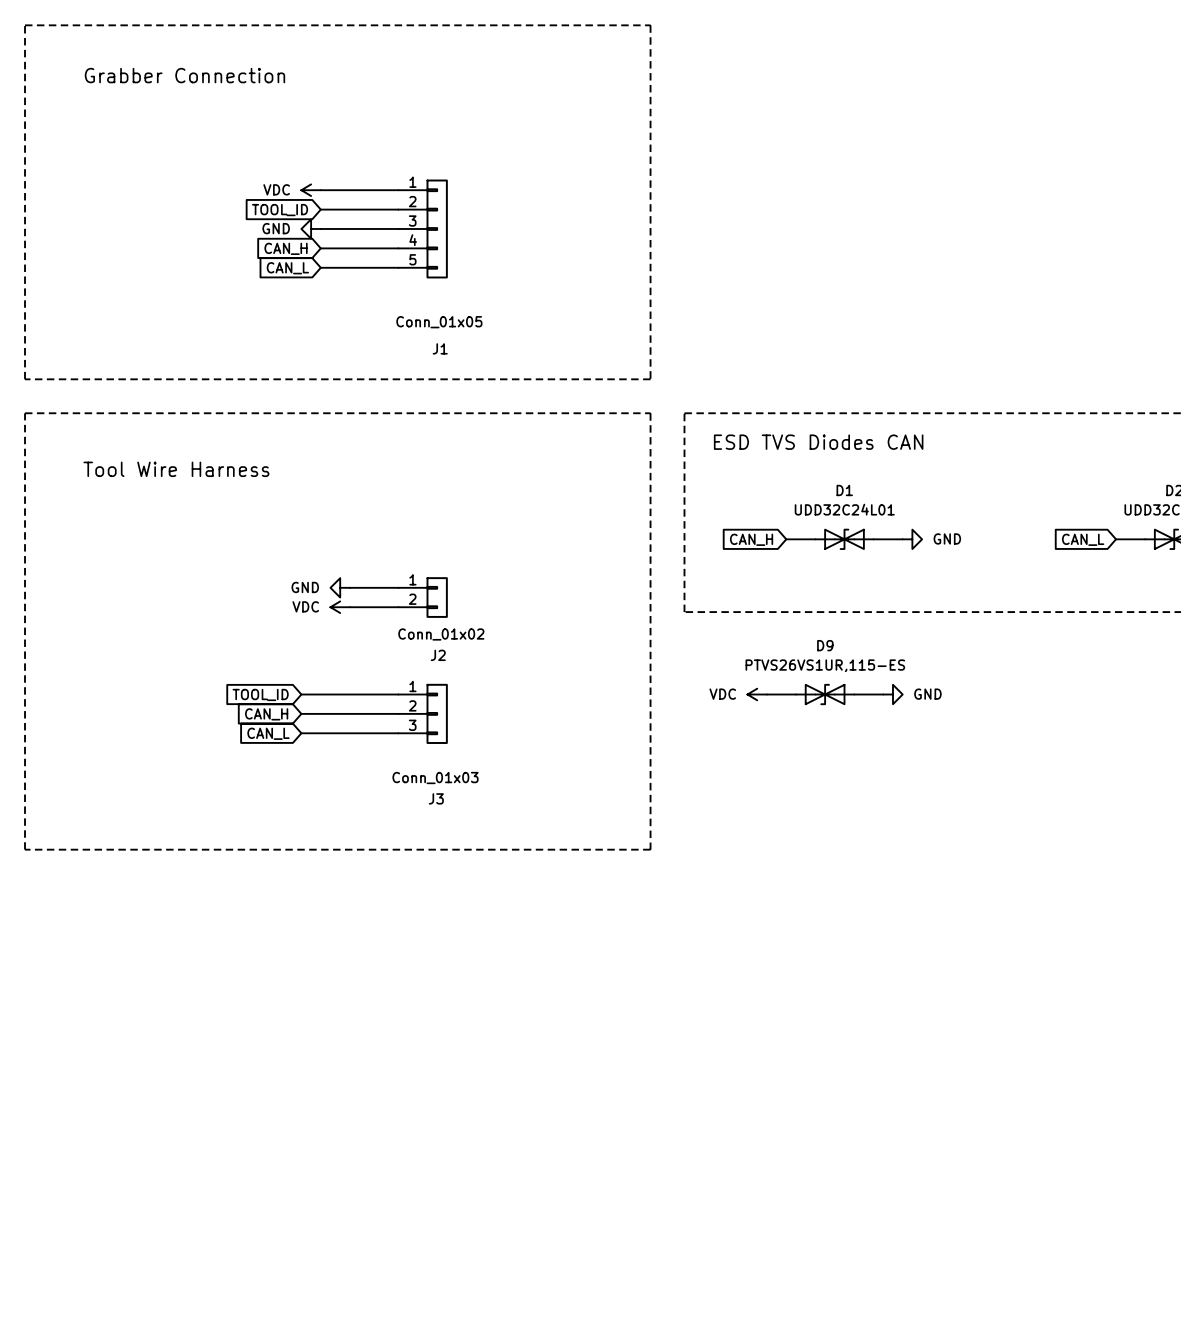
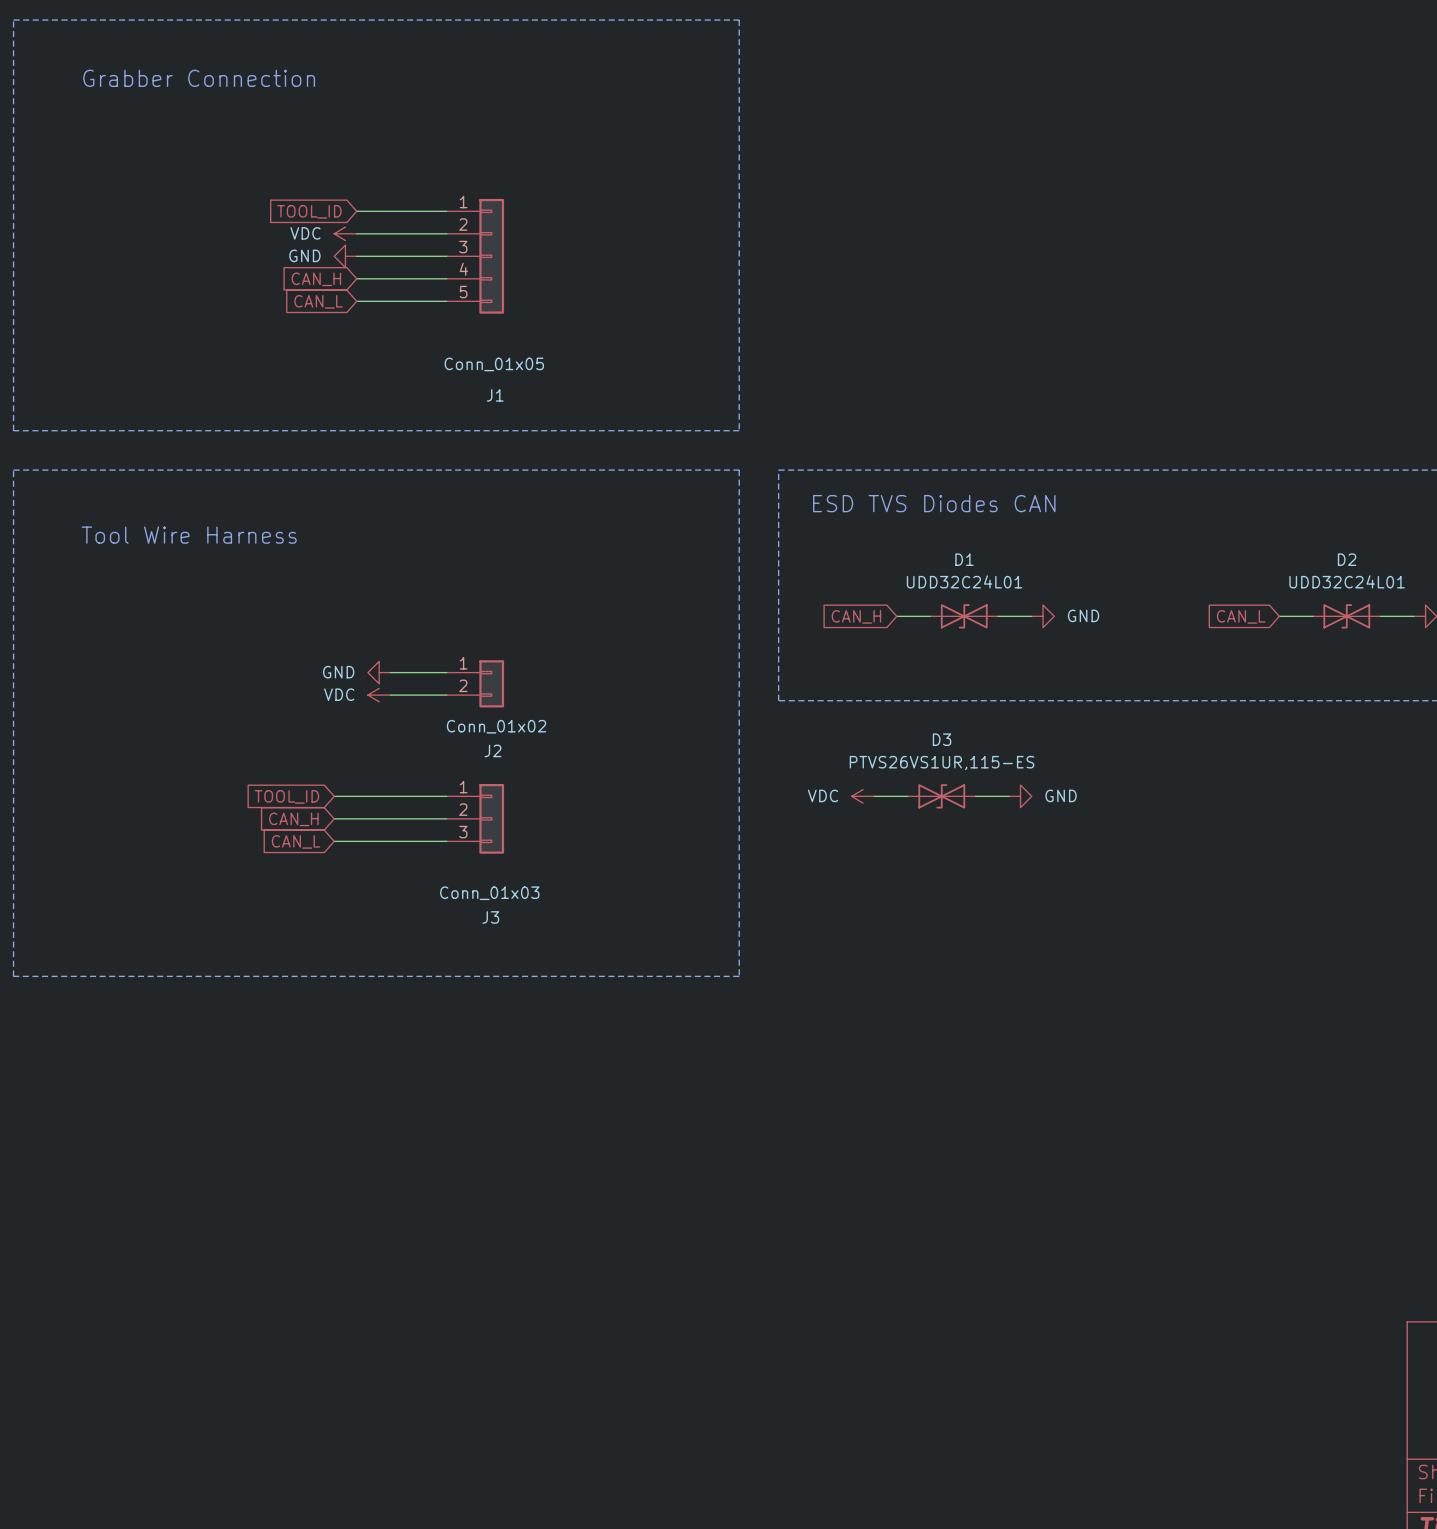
power symbol position: VDC (311, 190) -> VDC (345, 233)
global label position: TOOL_ID (280, 210) -> TOOL_ID (309, 211)
D9 name: D9 (825, 645) -> D3 (942, 739)

